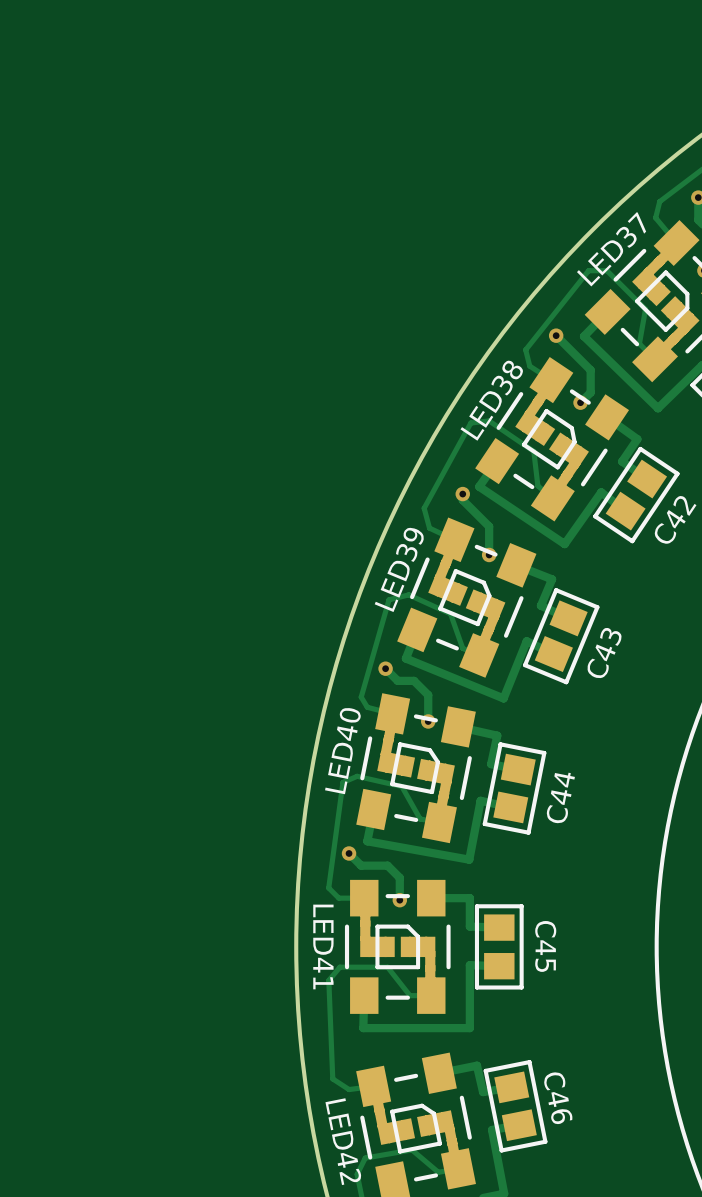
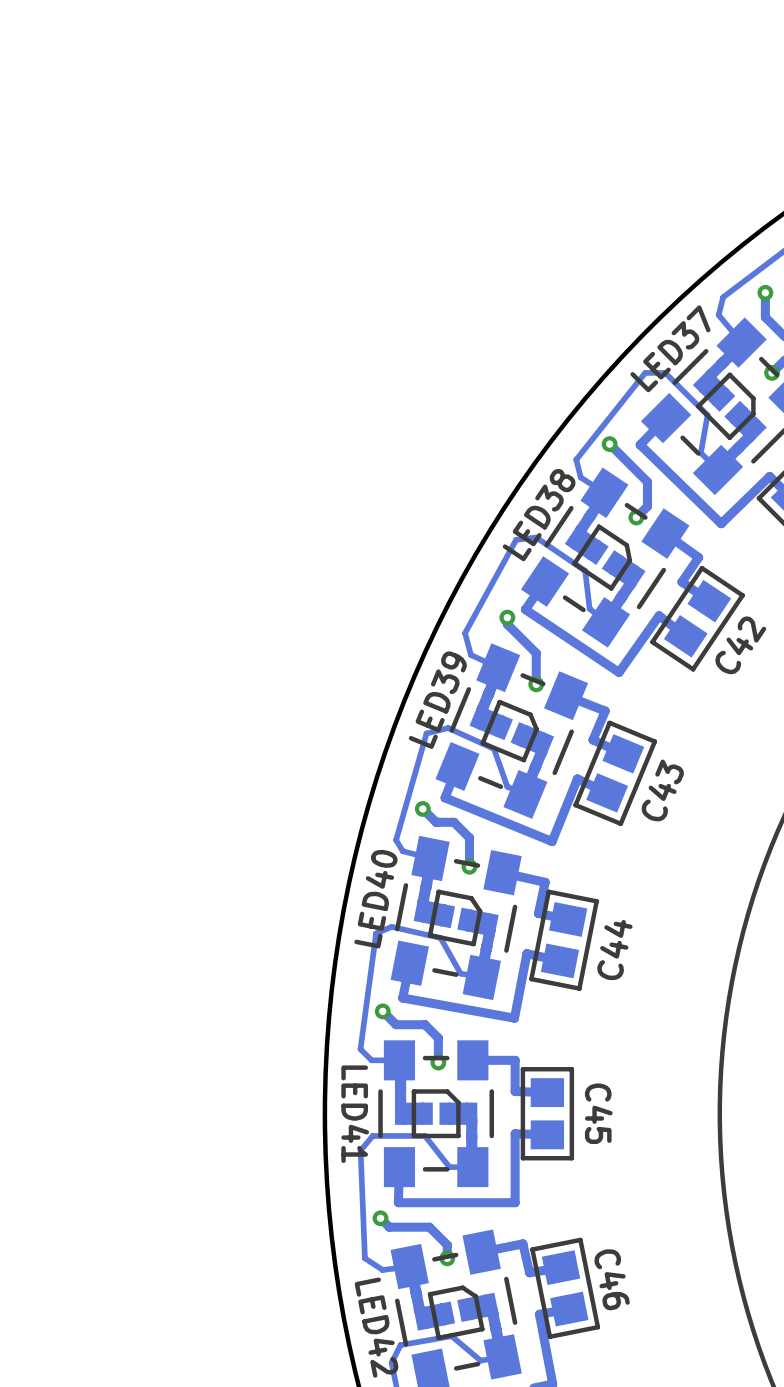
track: none -> (380, 1218) (389, 1227) (429, 1227) (447, 1244) (447, 1258)
via: none -> (380, 1218)
via: none -> (447, 1258)

